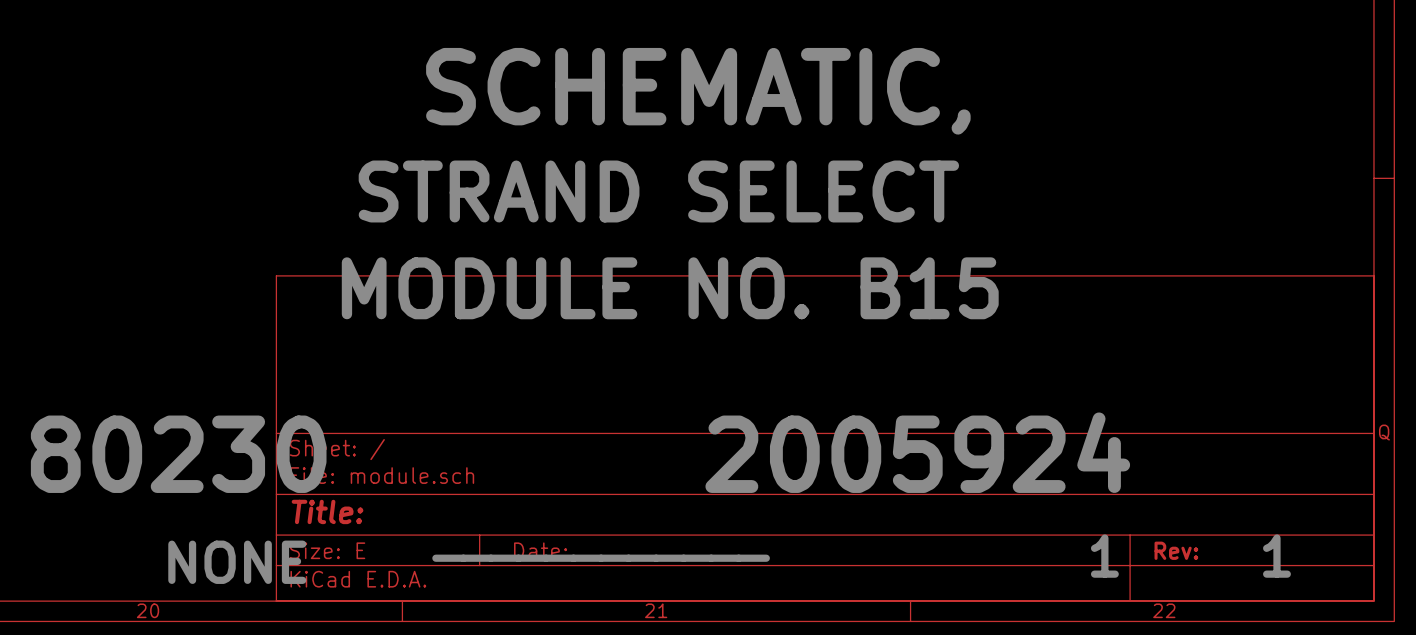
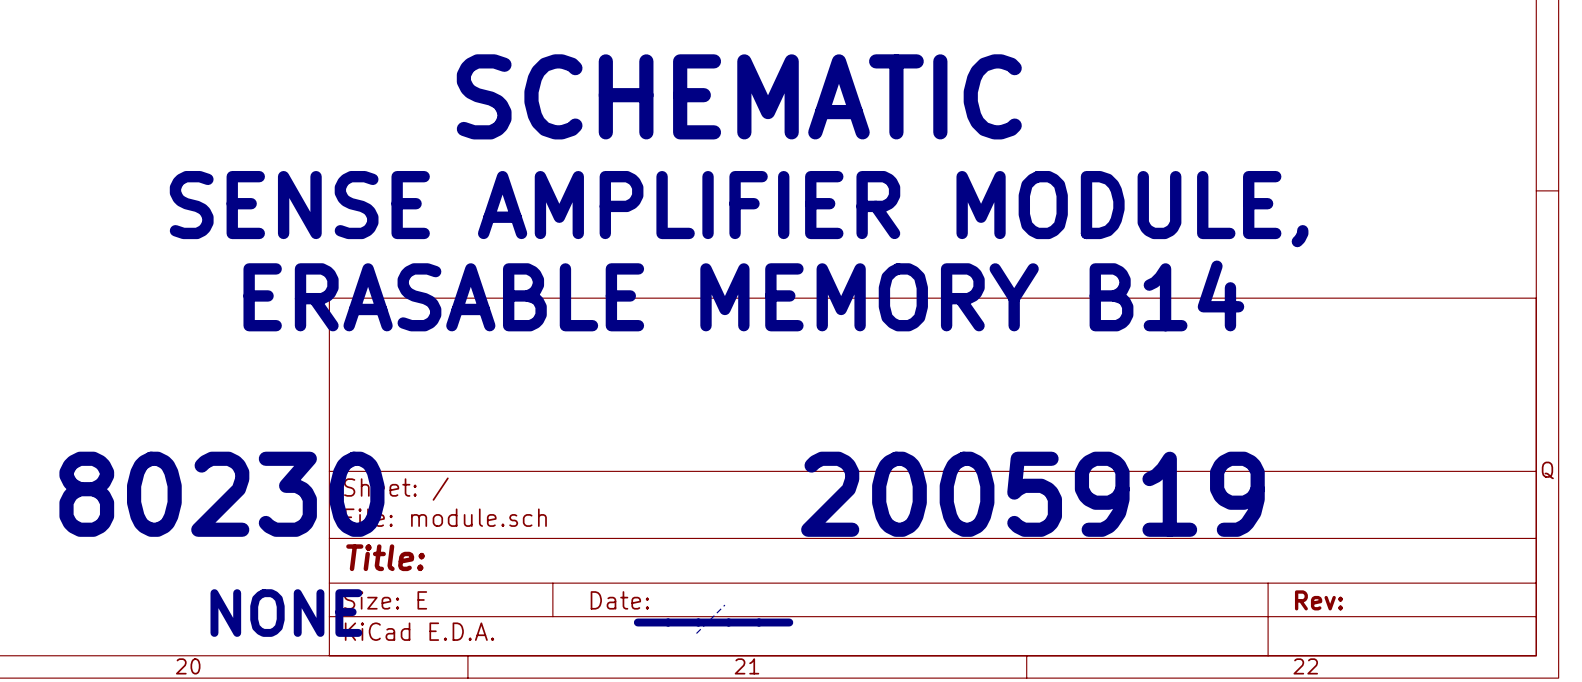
text: SCHEMATIC, (698, 91) -> SCHEMATIC (739, 96)
text: STRAND SELECT (658, 191) -> none
text: none -> SENSE AMPLIFIER MODULE, (739, 209)
text: none -> ERASABLE MEMORY B14 (743, 295)
text: MODULE NO. B15 (670, 288) -> none
text: 2005924 (917, 452) -> 2005919 (1032, 494)
line: none -> (724, 605) (696, 633)
text: 1 1 (1190, 556) -> none
text: ____________ (601, 558) -> none
text: none -> _____ (713, 622)

